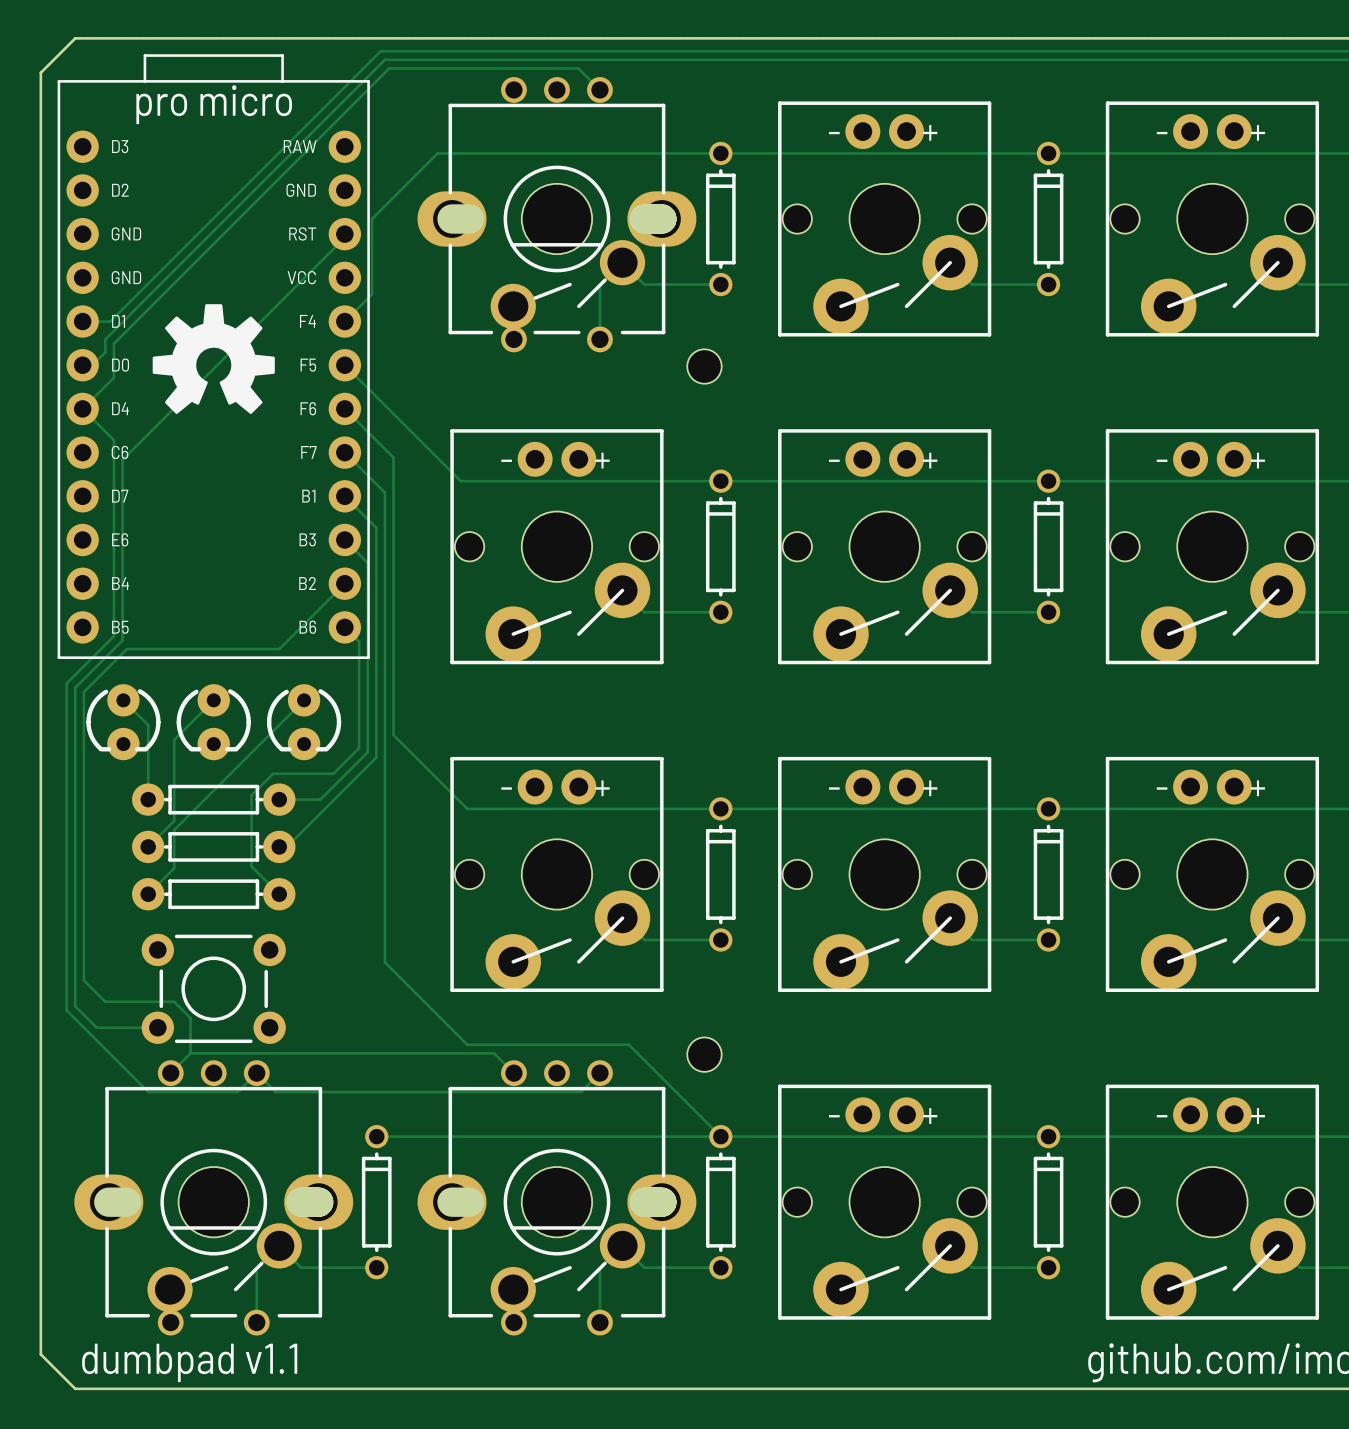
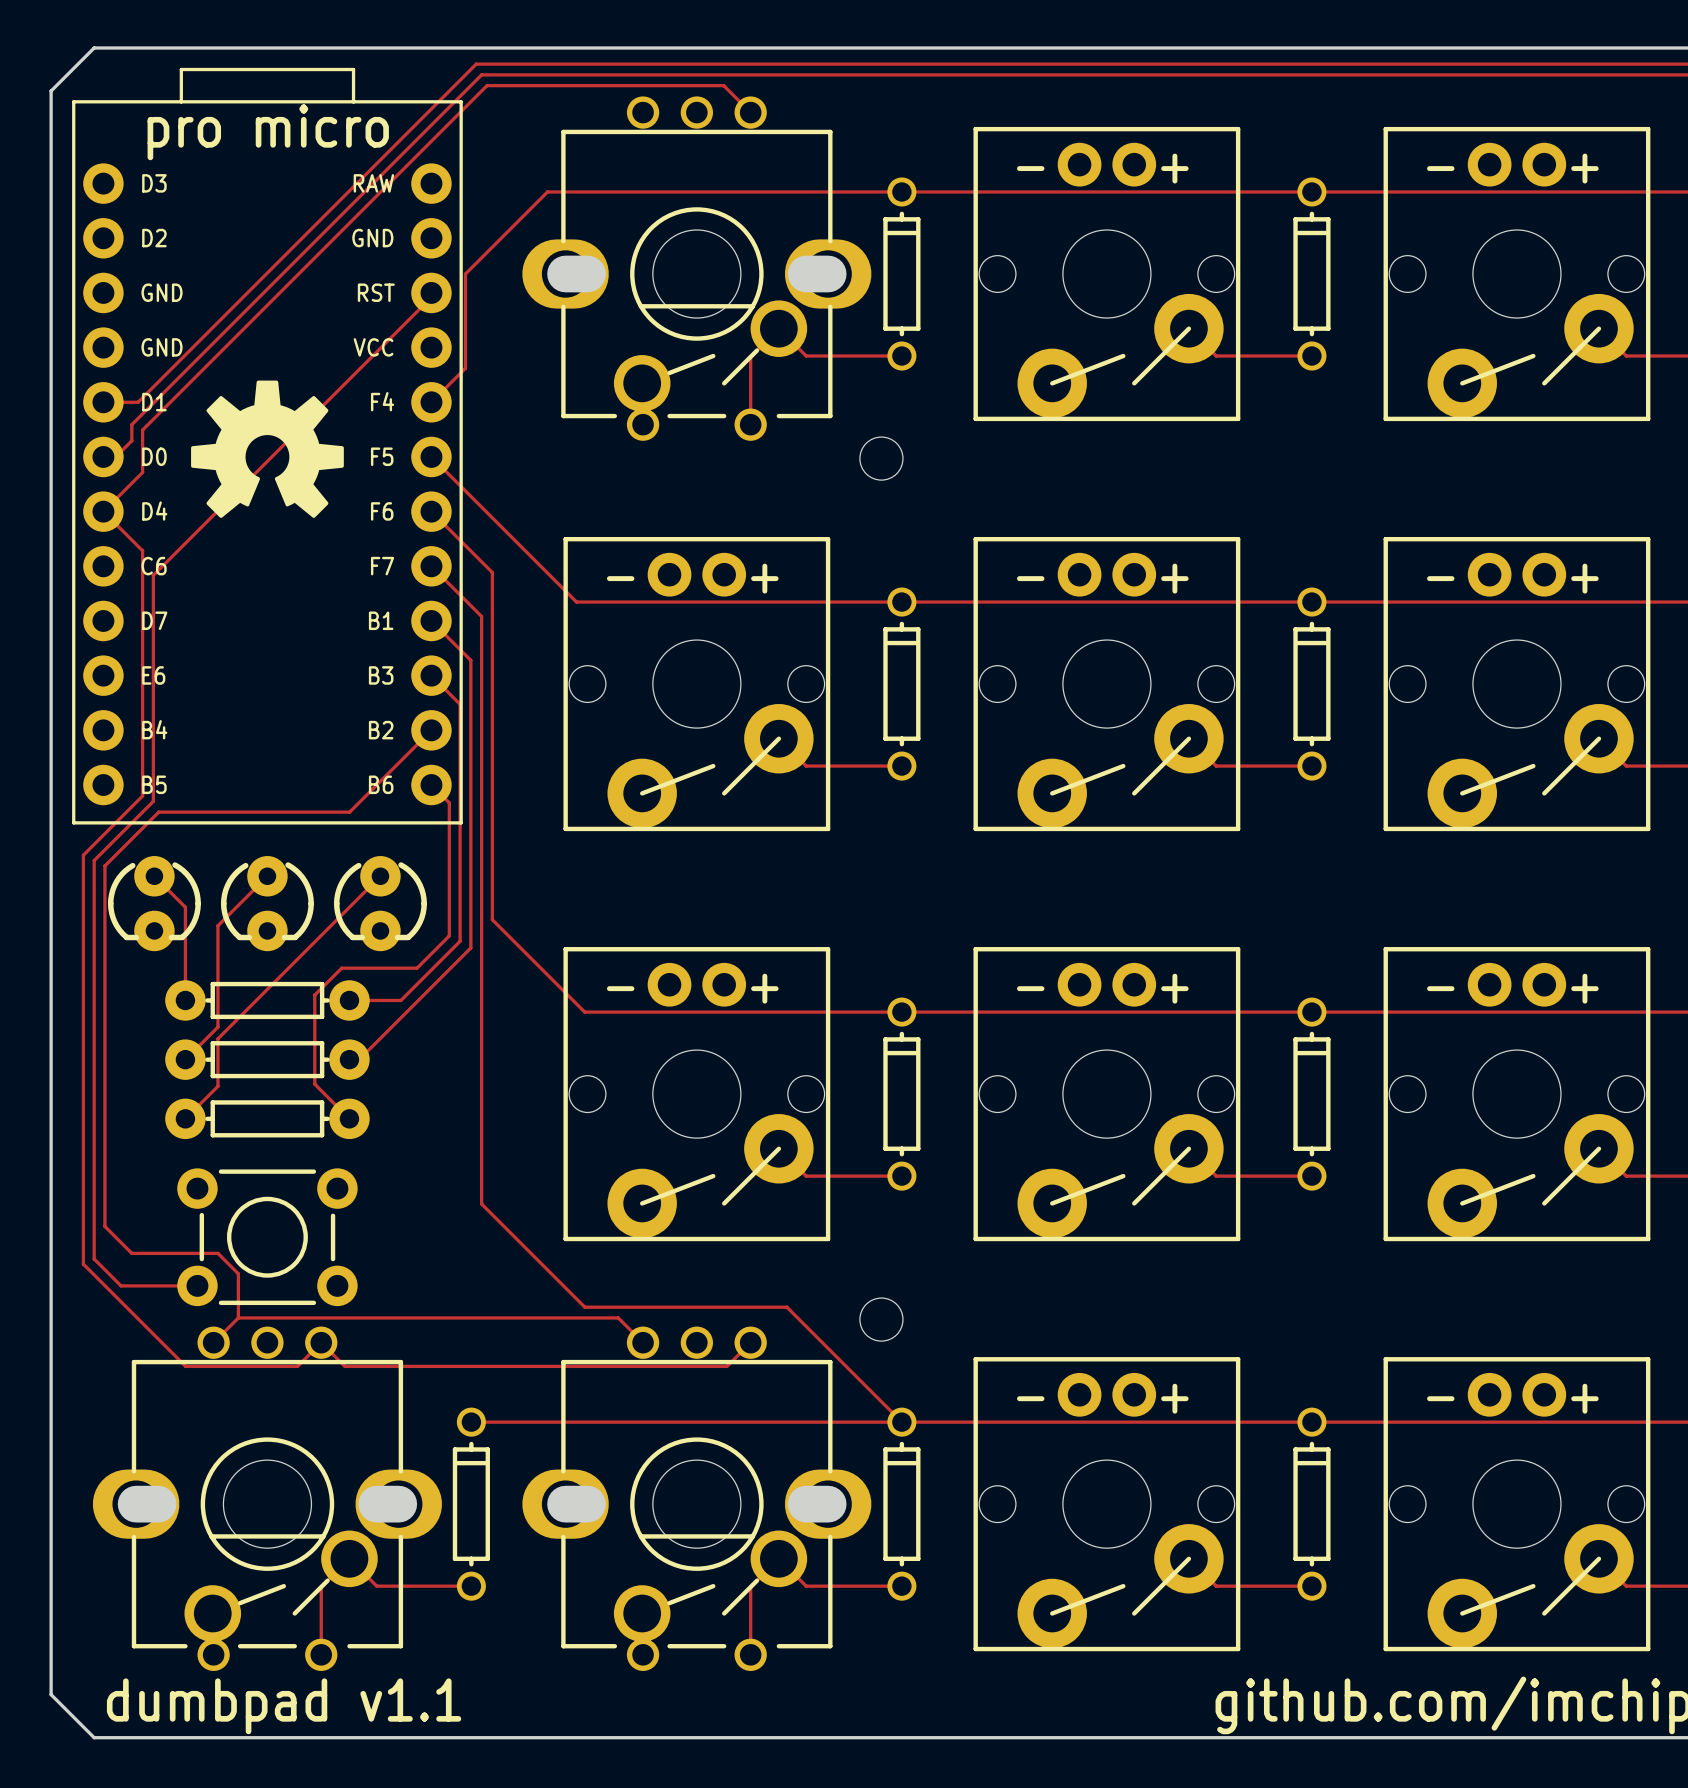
part footprint: [417, 77, 697, 353] -> [522, 96, 872, 441]
part footprint: [74, 1060, 354, 1336] -> [92, 1326, 443, 1671]
part footprint: [417, 1060, 697, 1336] -> [522, 1326, 872, 1671]

